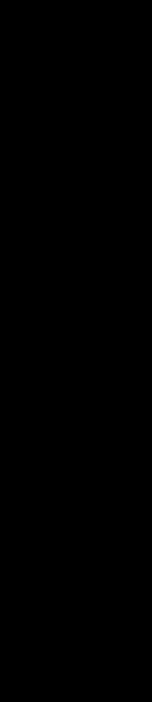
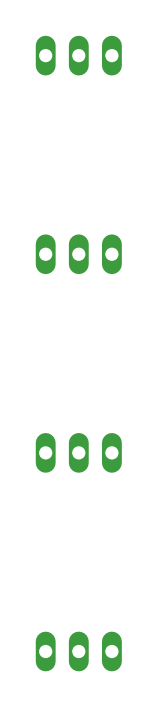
part: none -> (78, 55)
part: none -> (78, 254)
part: none -> (78, 452)
part: none -> (78, 651)

